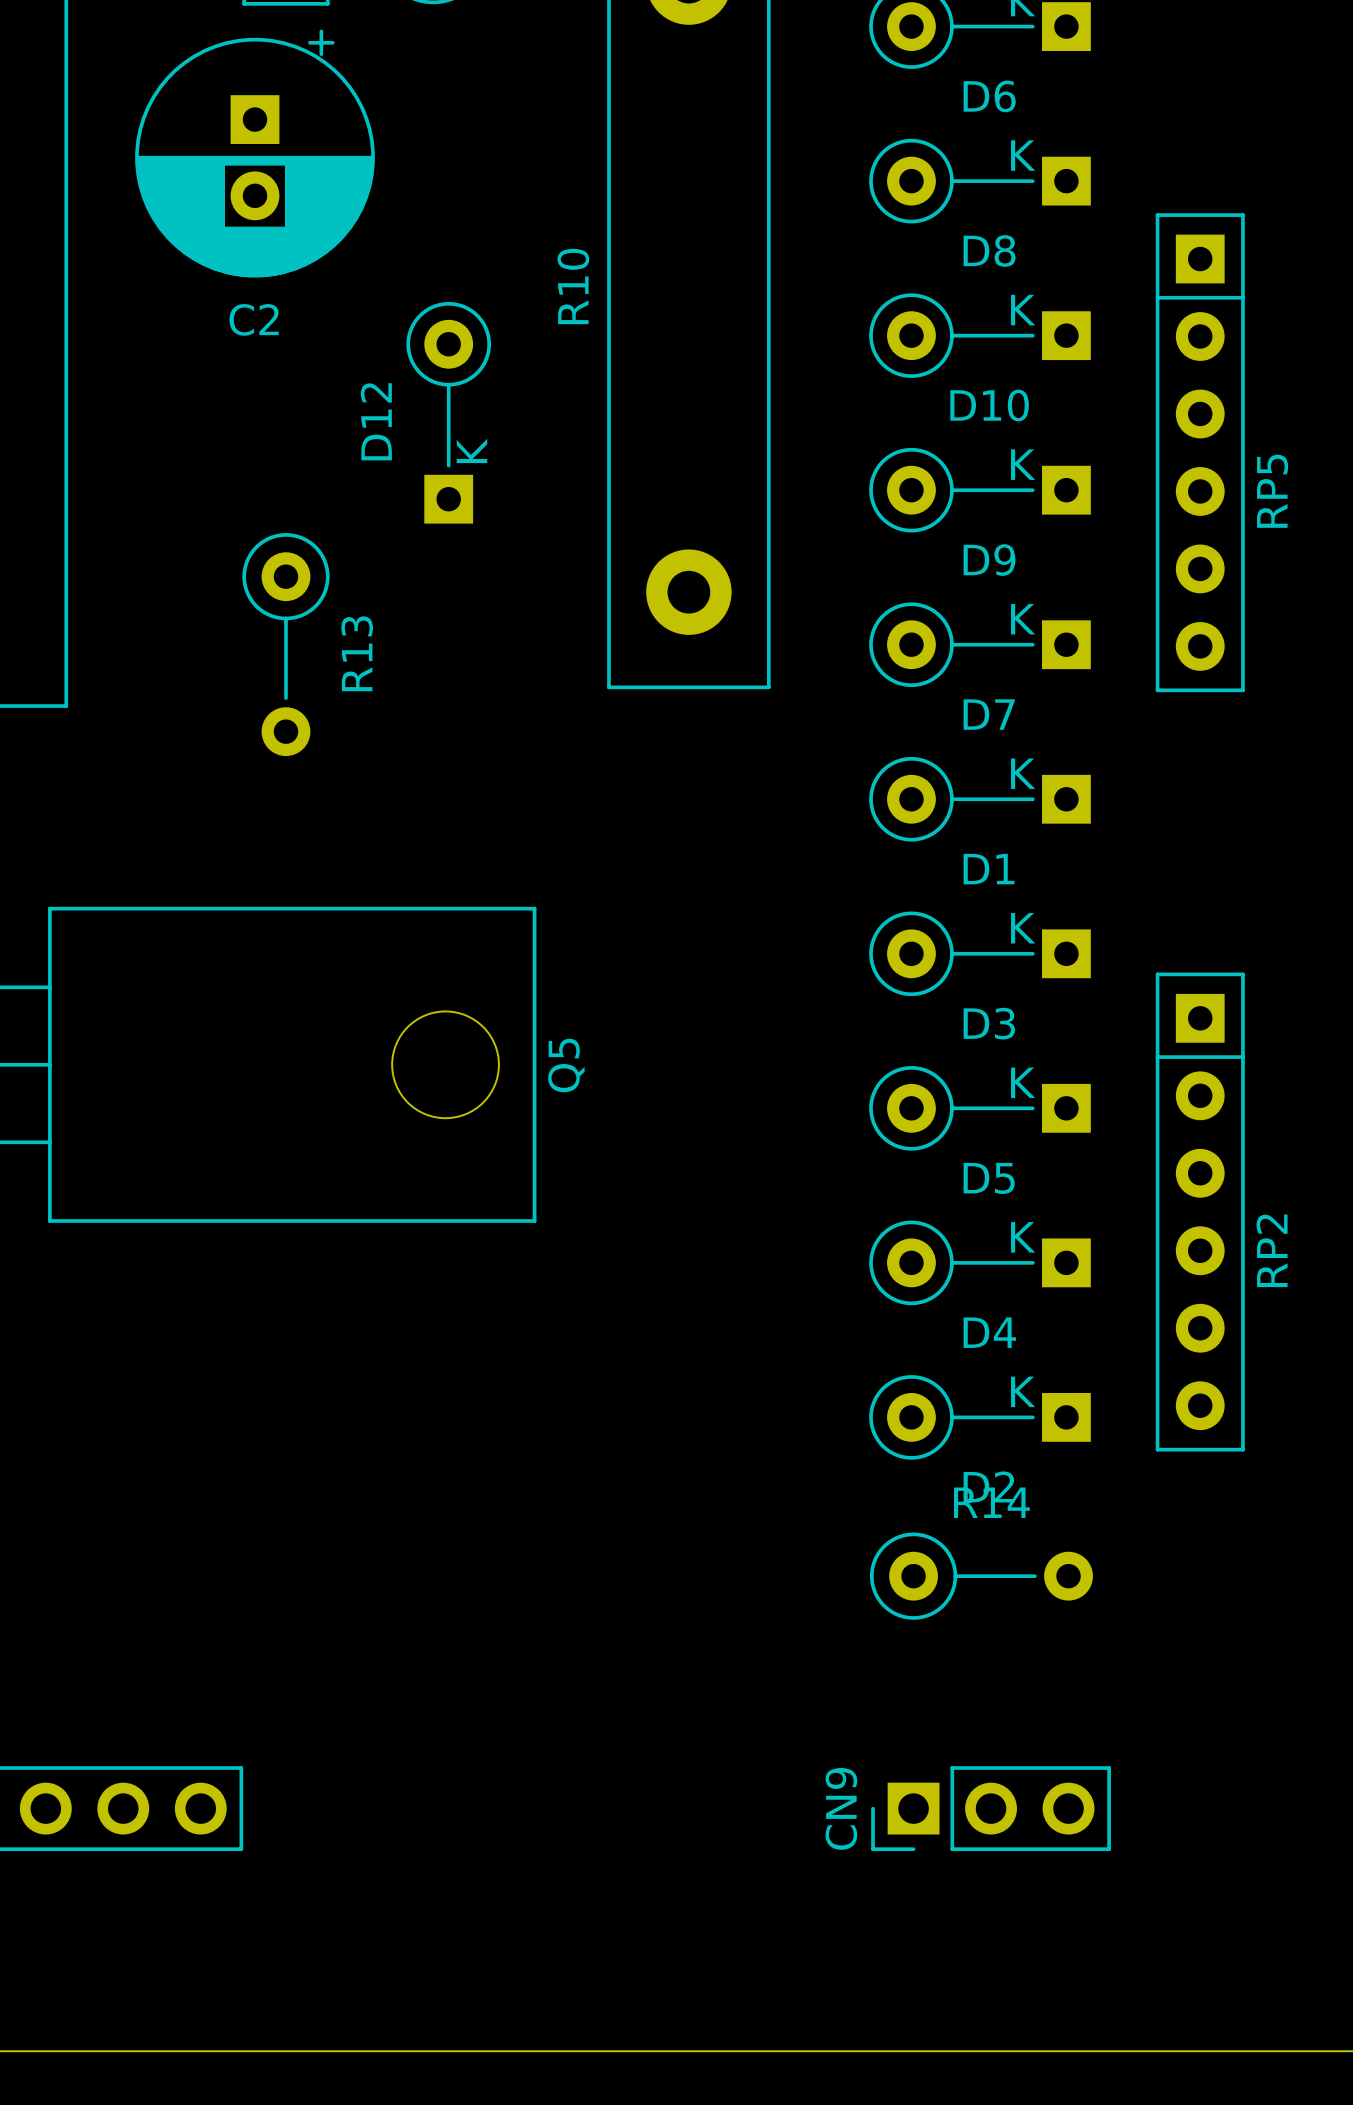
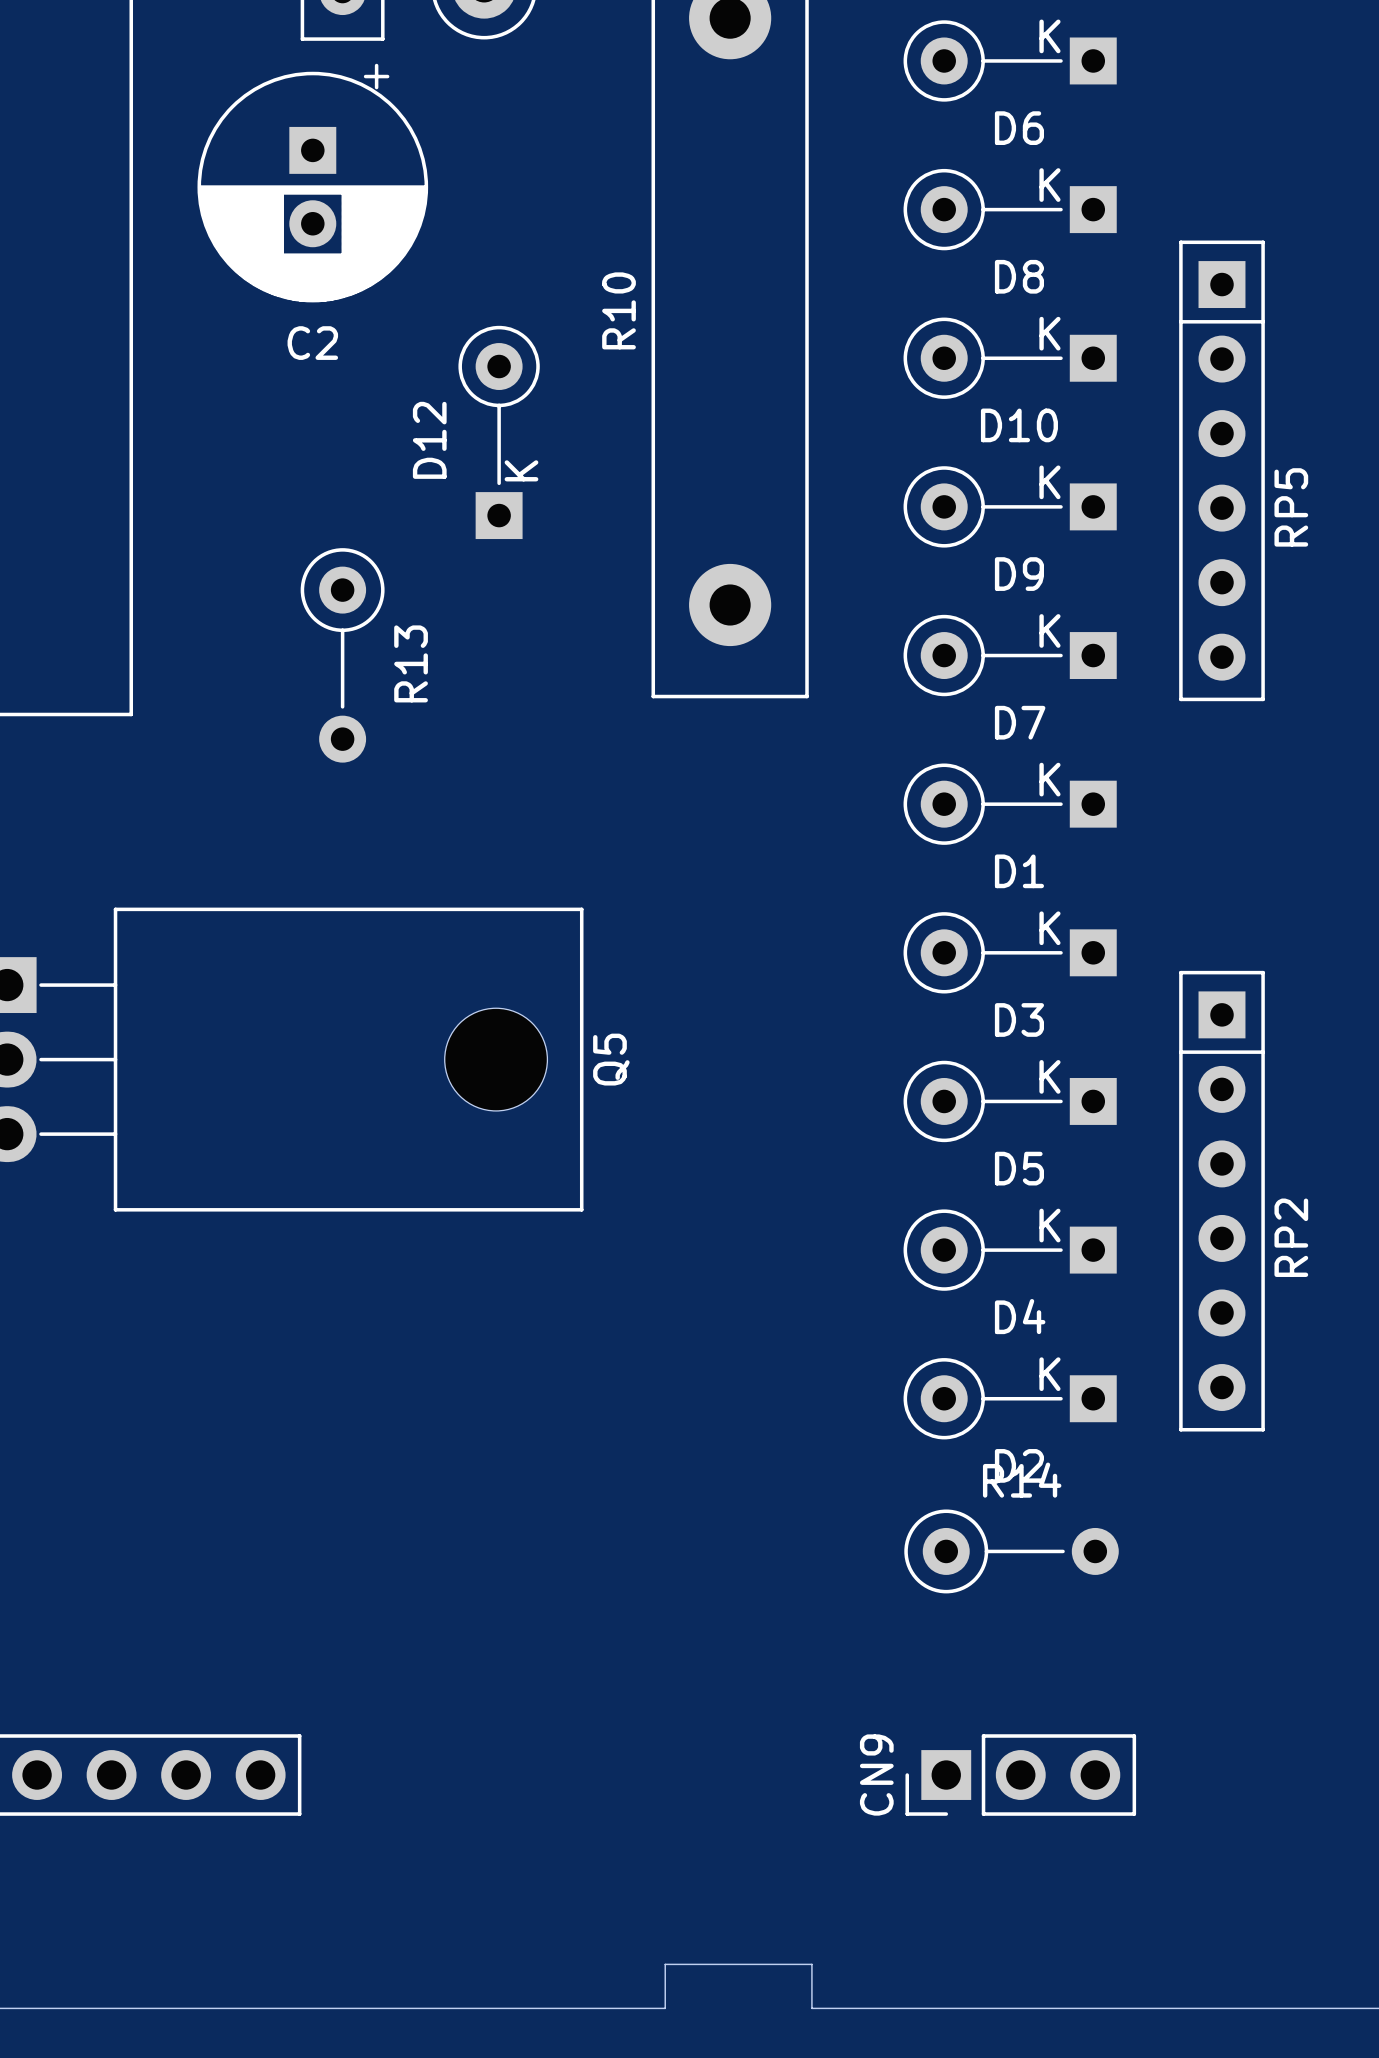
board edge: (621, 2051) (773, 2051) -> (665, 2008) (665, 1964) (811, 1964) (811, 2008)

